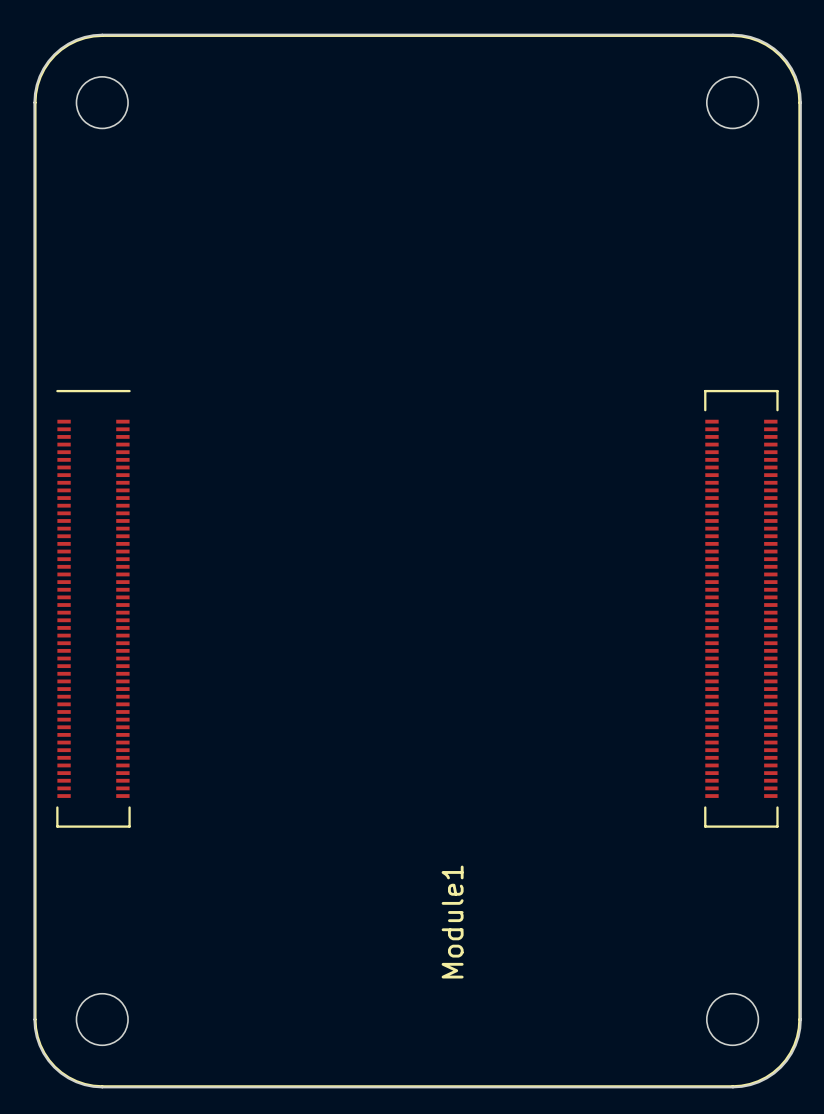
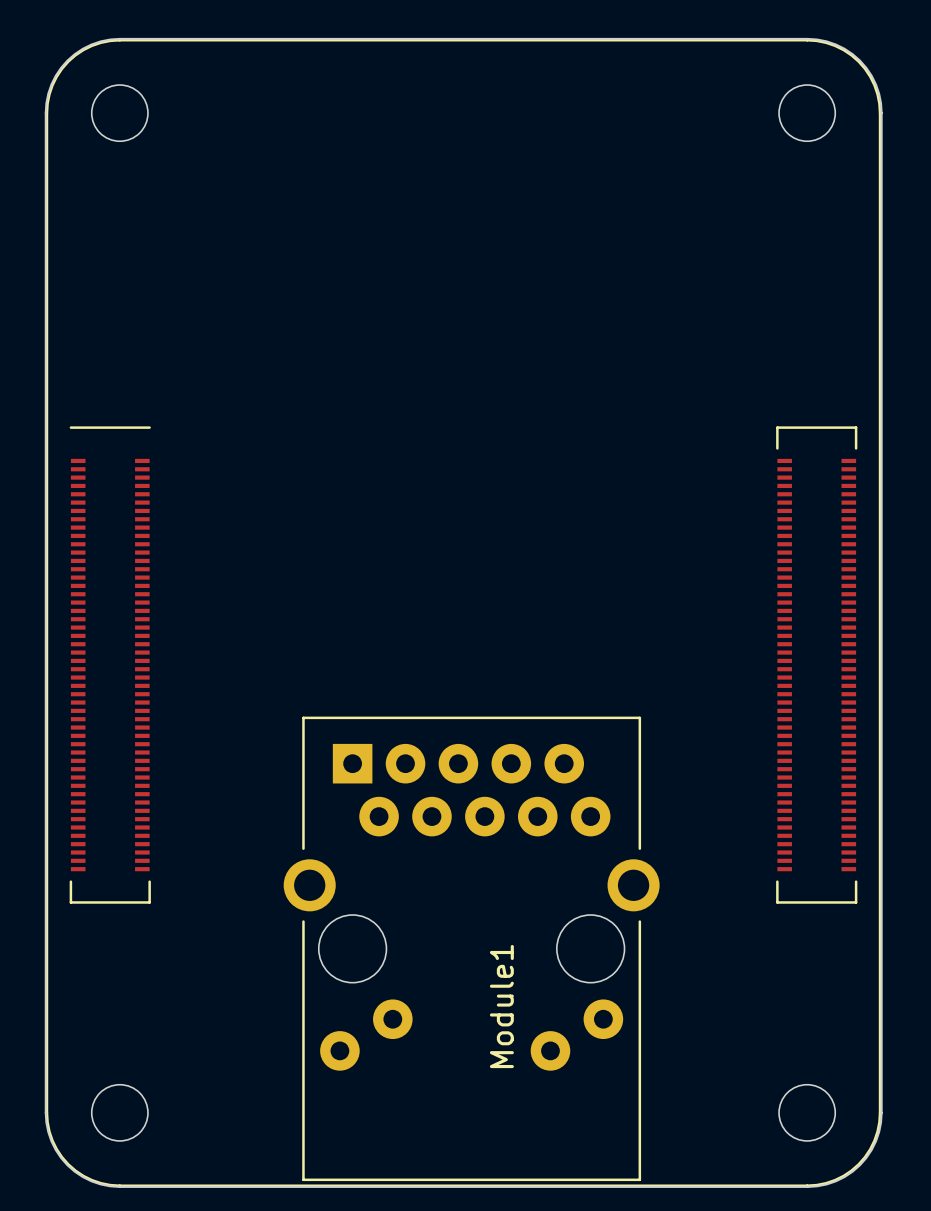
part: none -> (471, 948)

